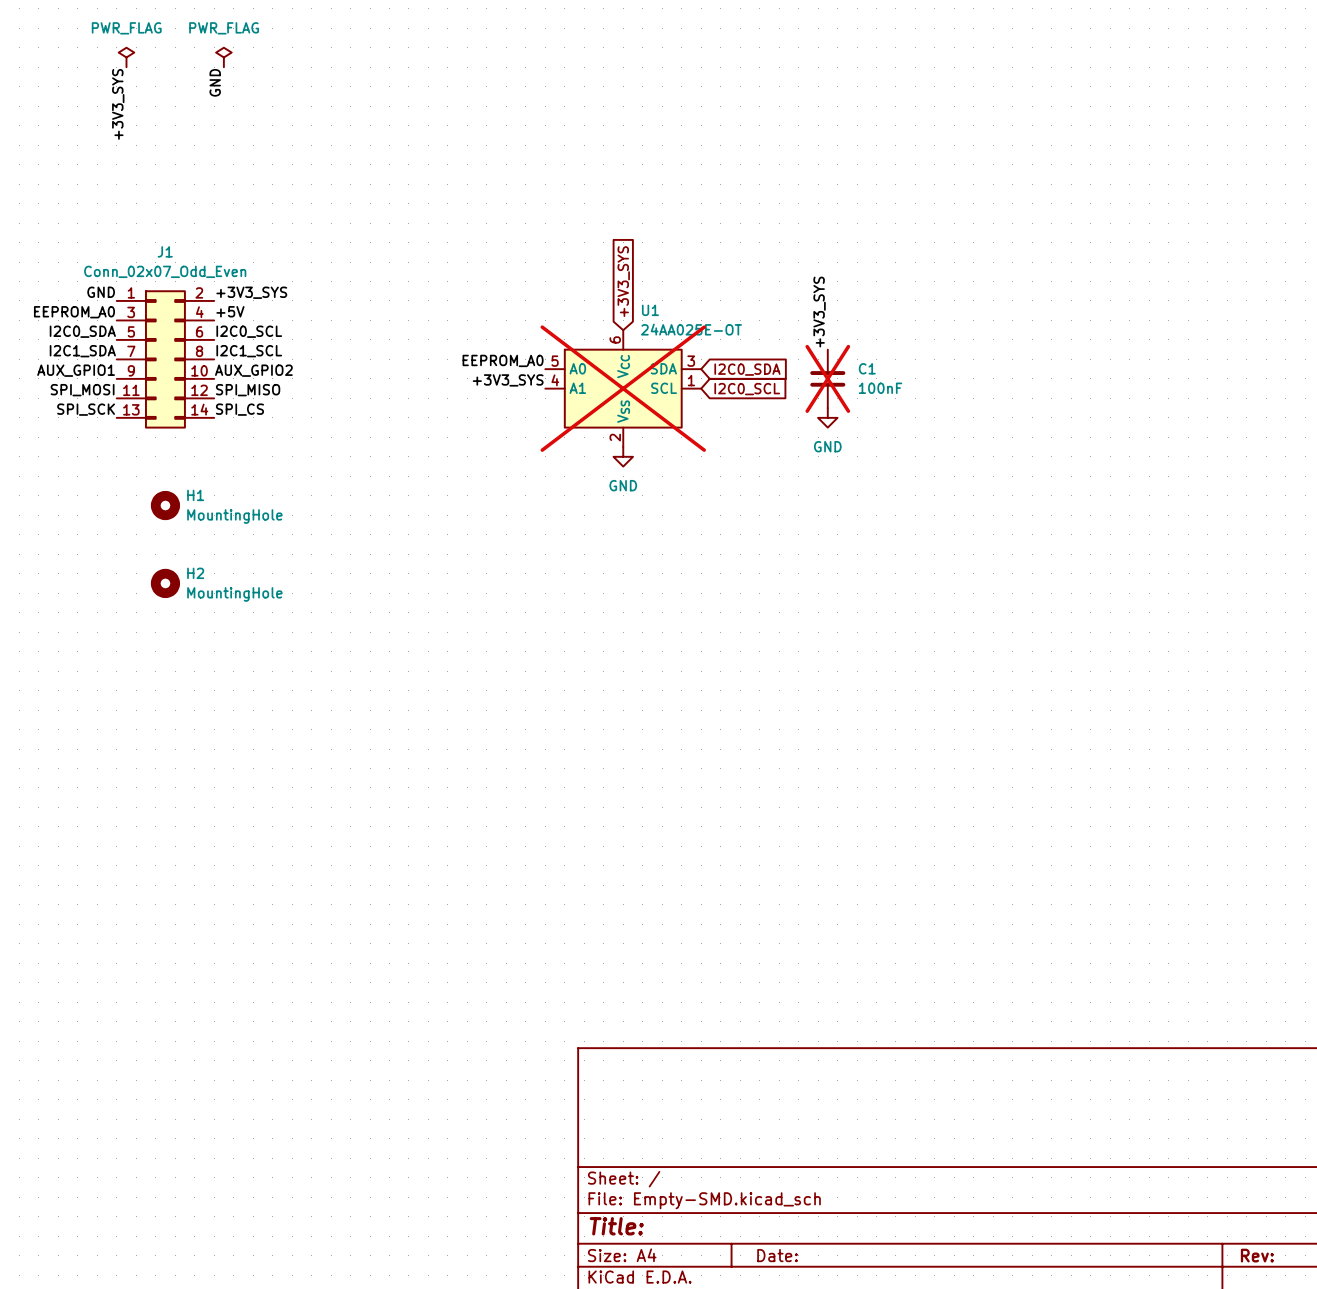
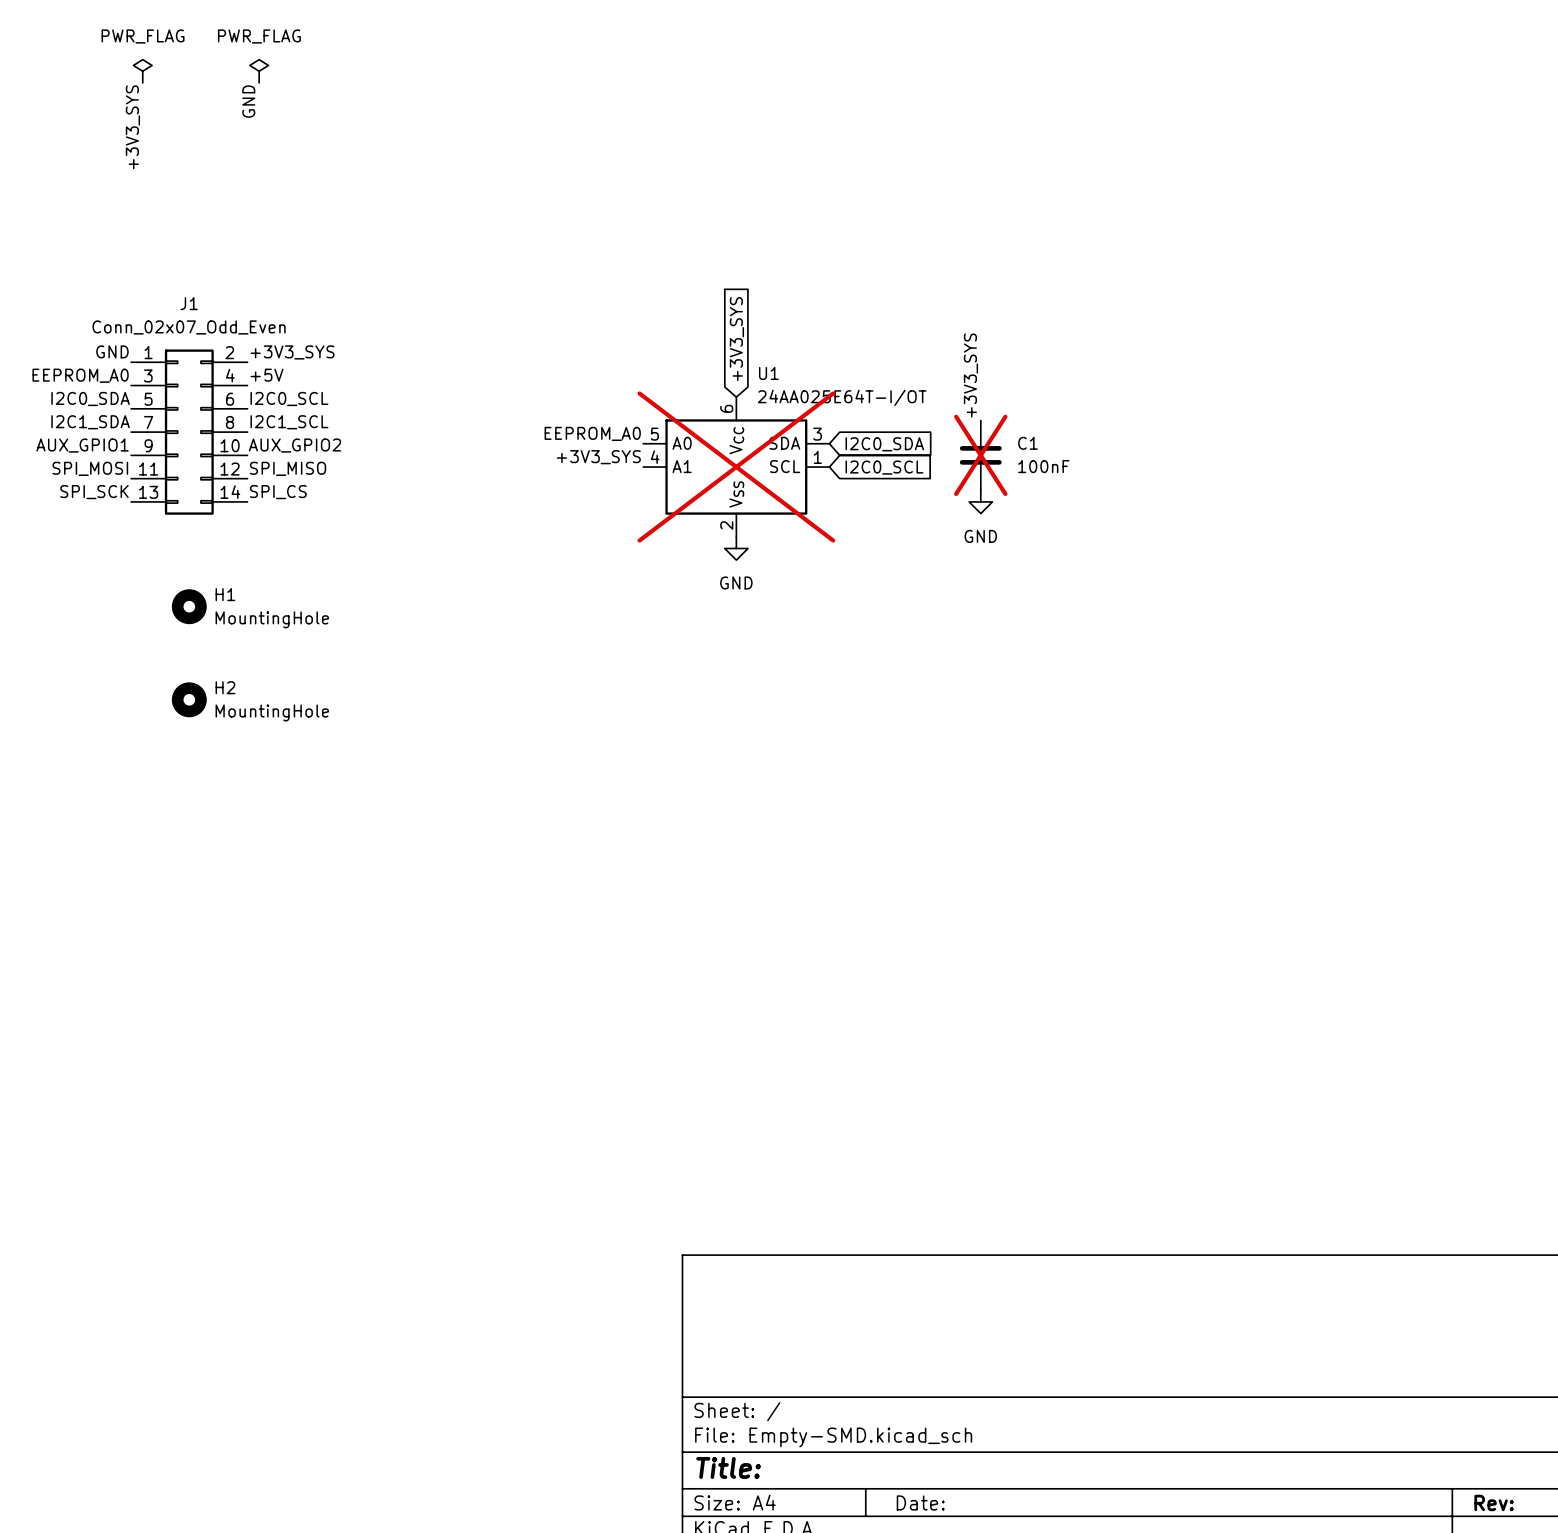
U1 value: 24AA025E-OT (691, 329) -> 24AA025E64T-I/OT (842, 397)

